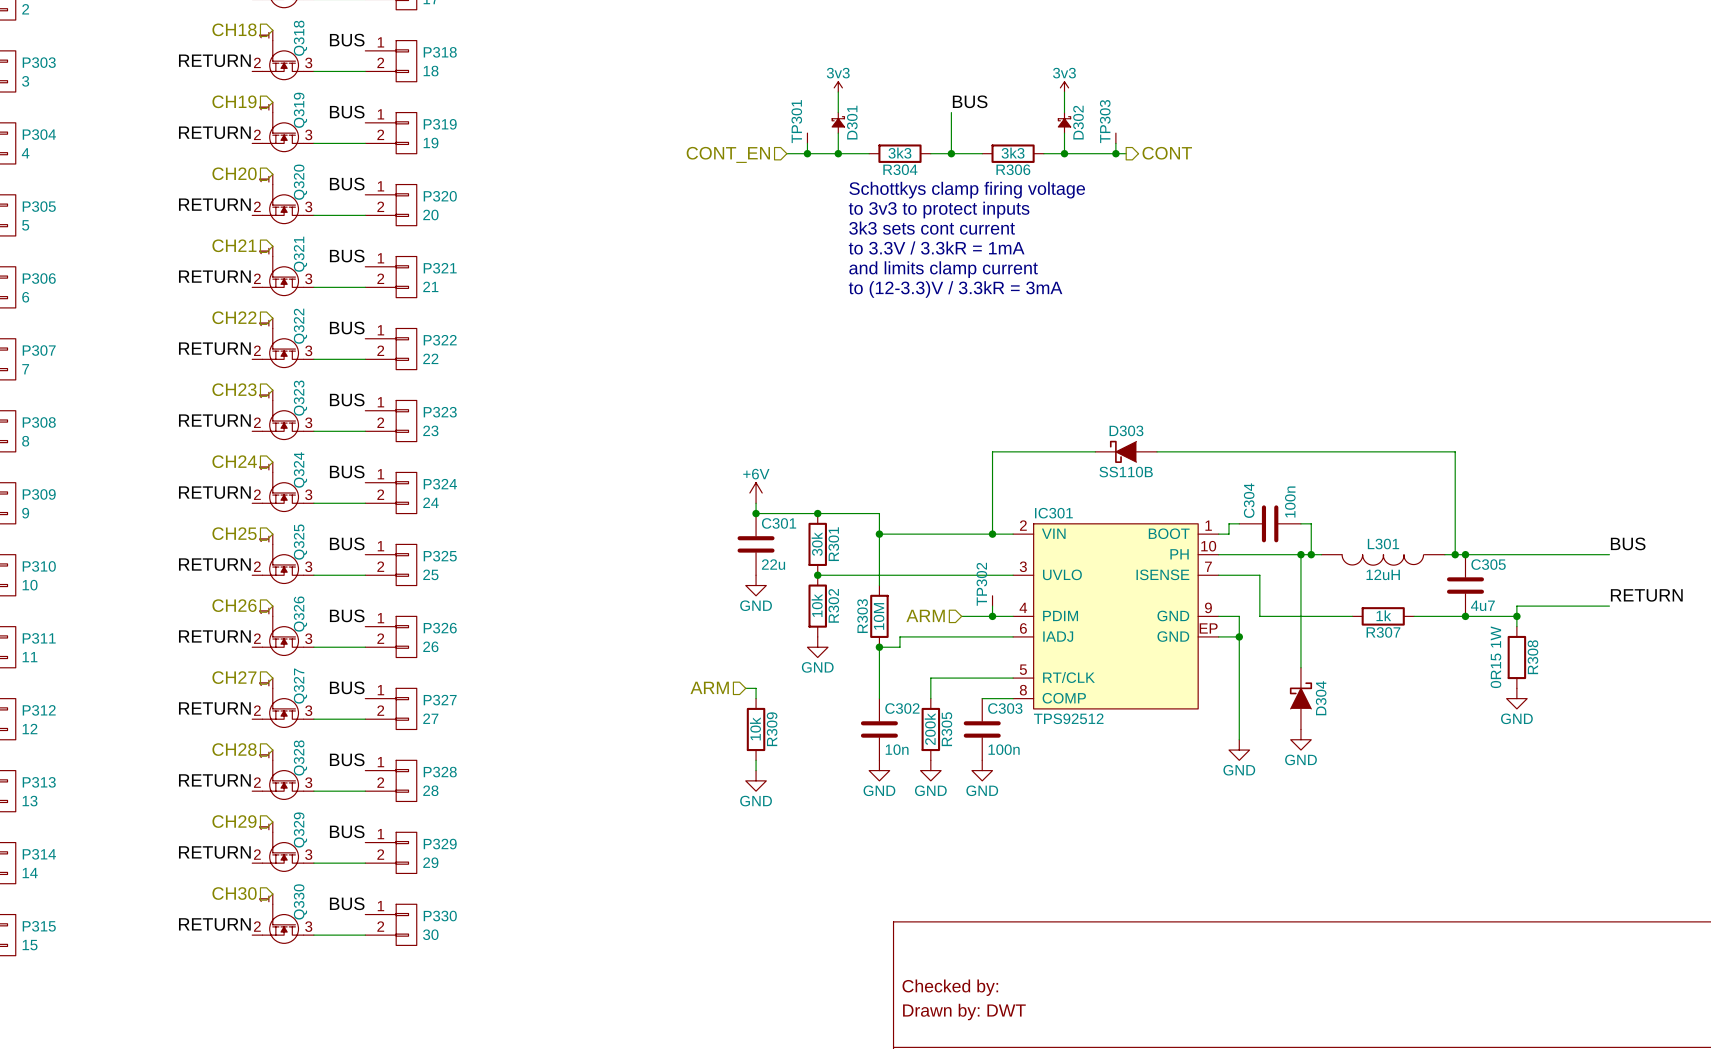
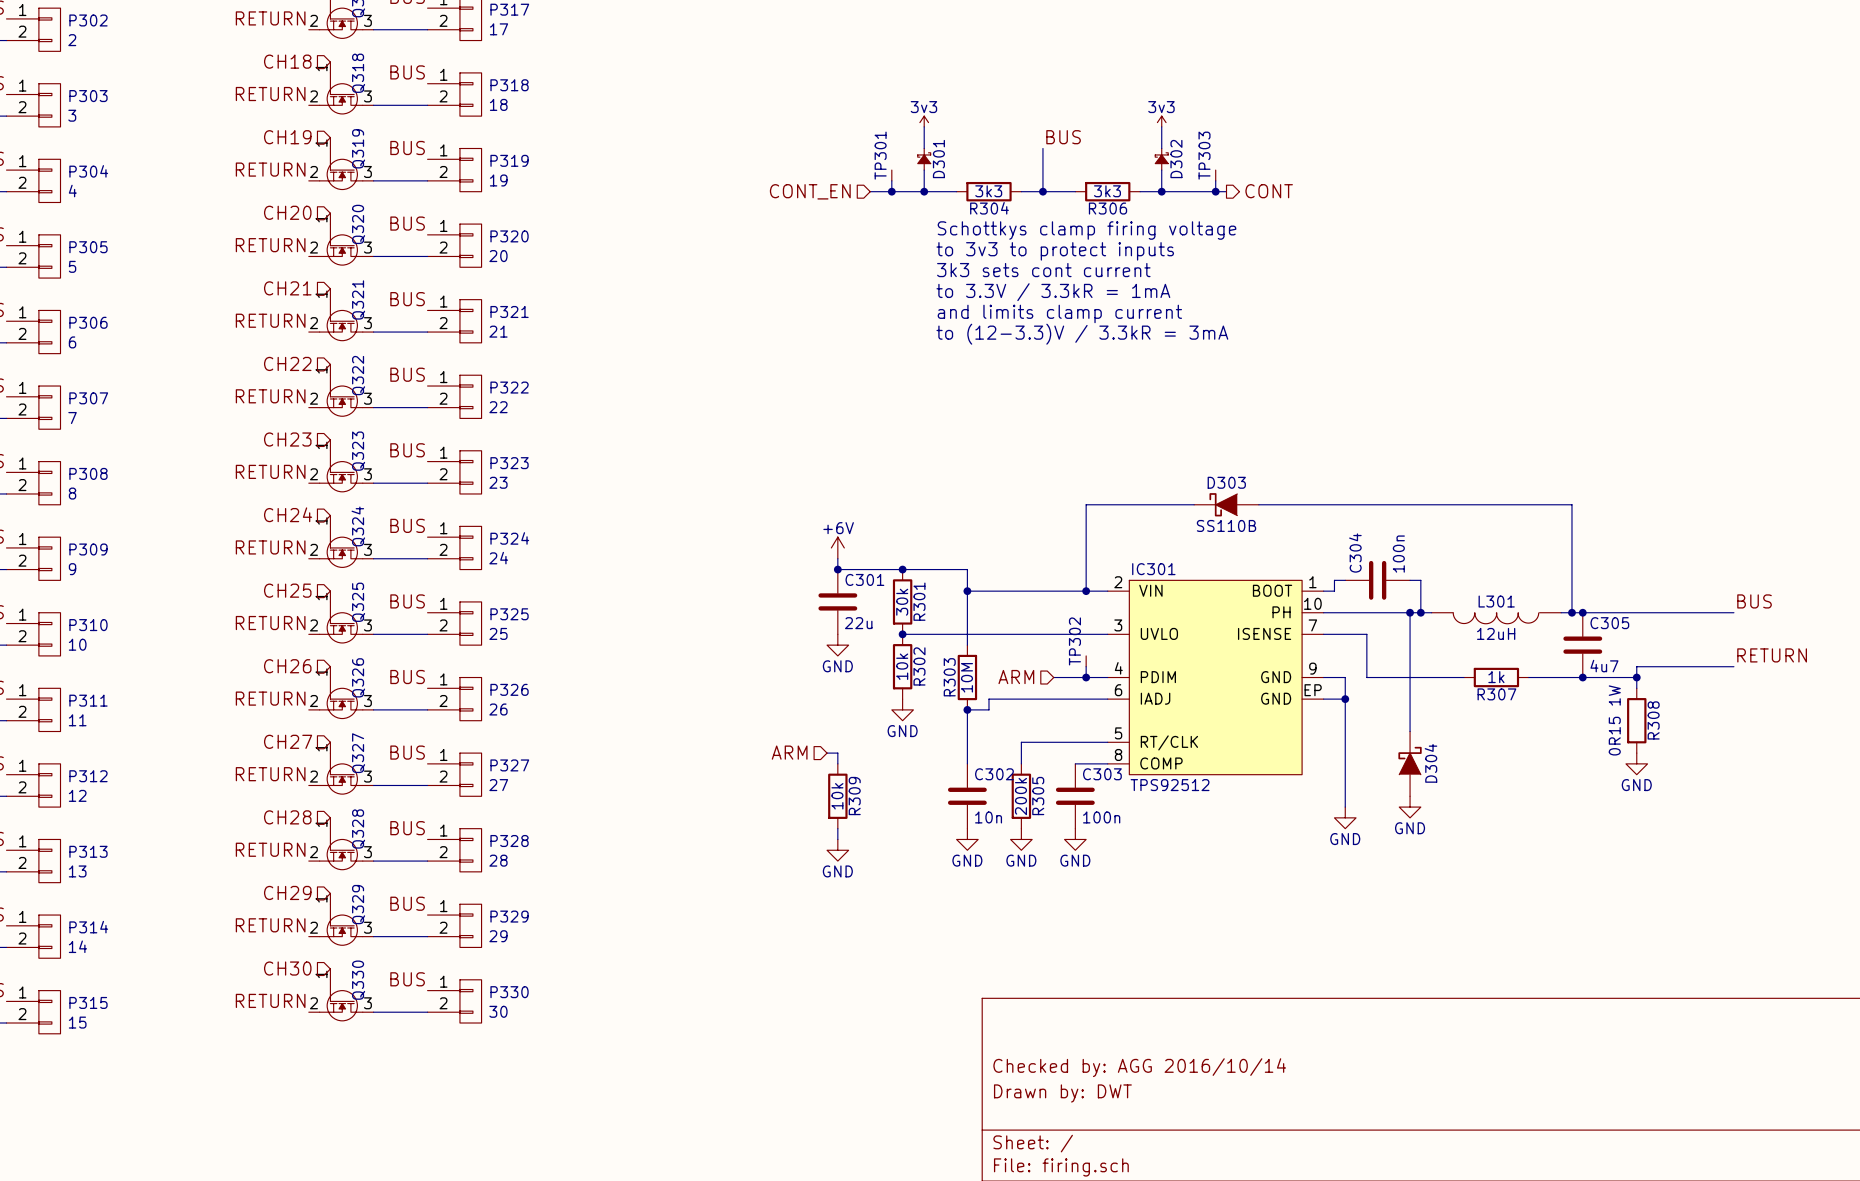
title block: Checked by: (950, 987) -> Checked by: AGG 2016/10/14 (1139, 1067)

